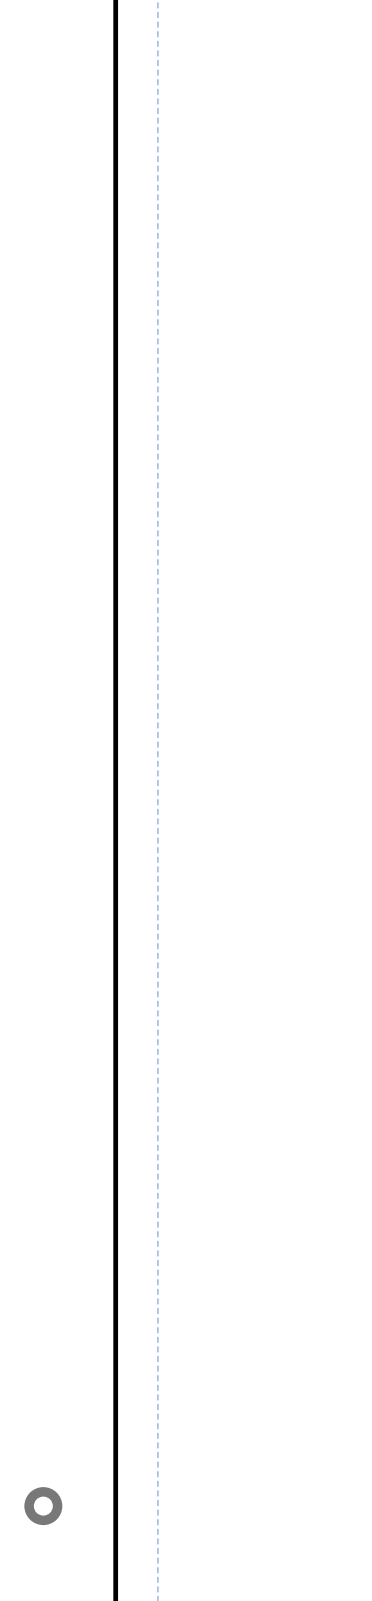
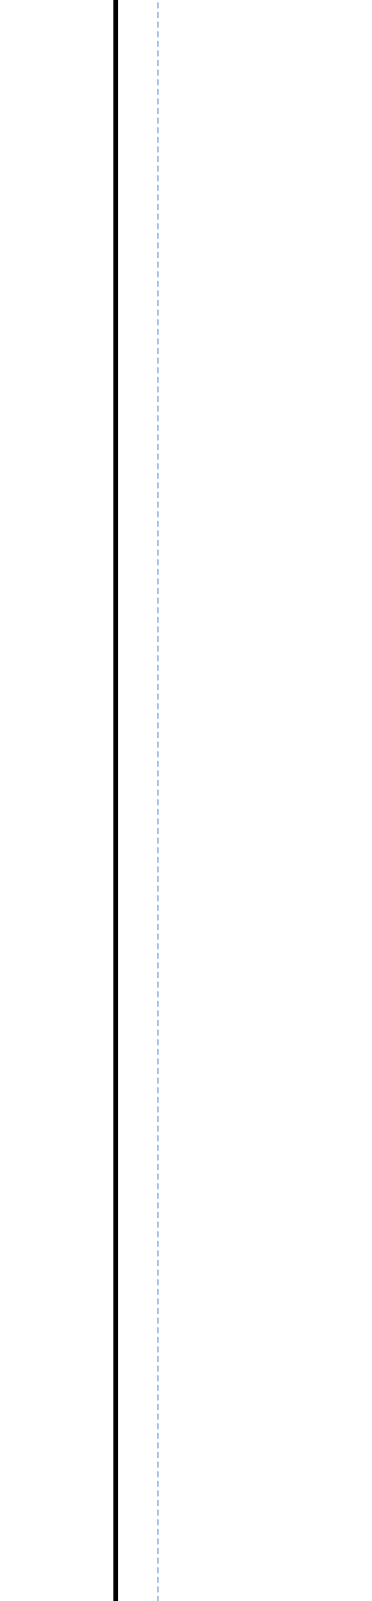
via: (43, 1506) -> none

